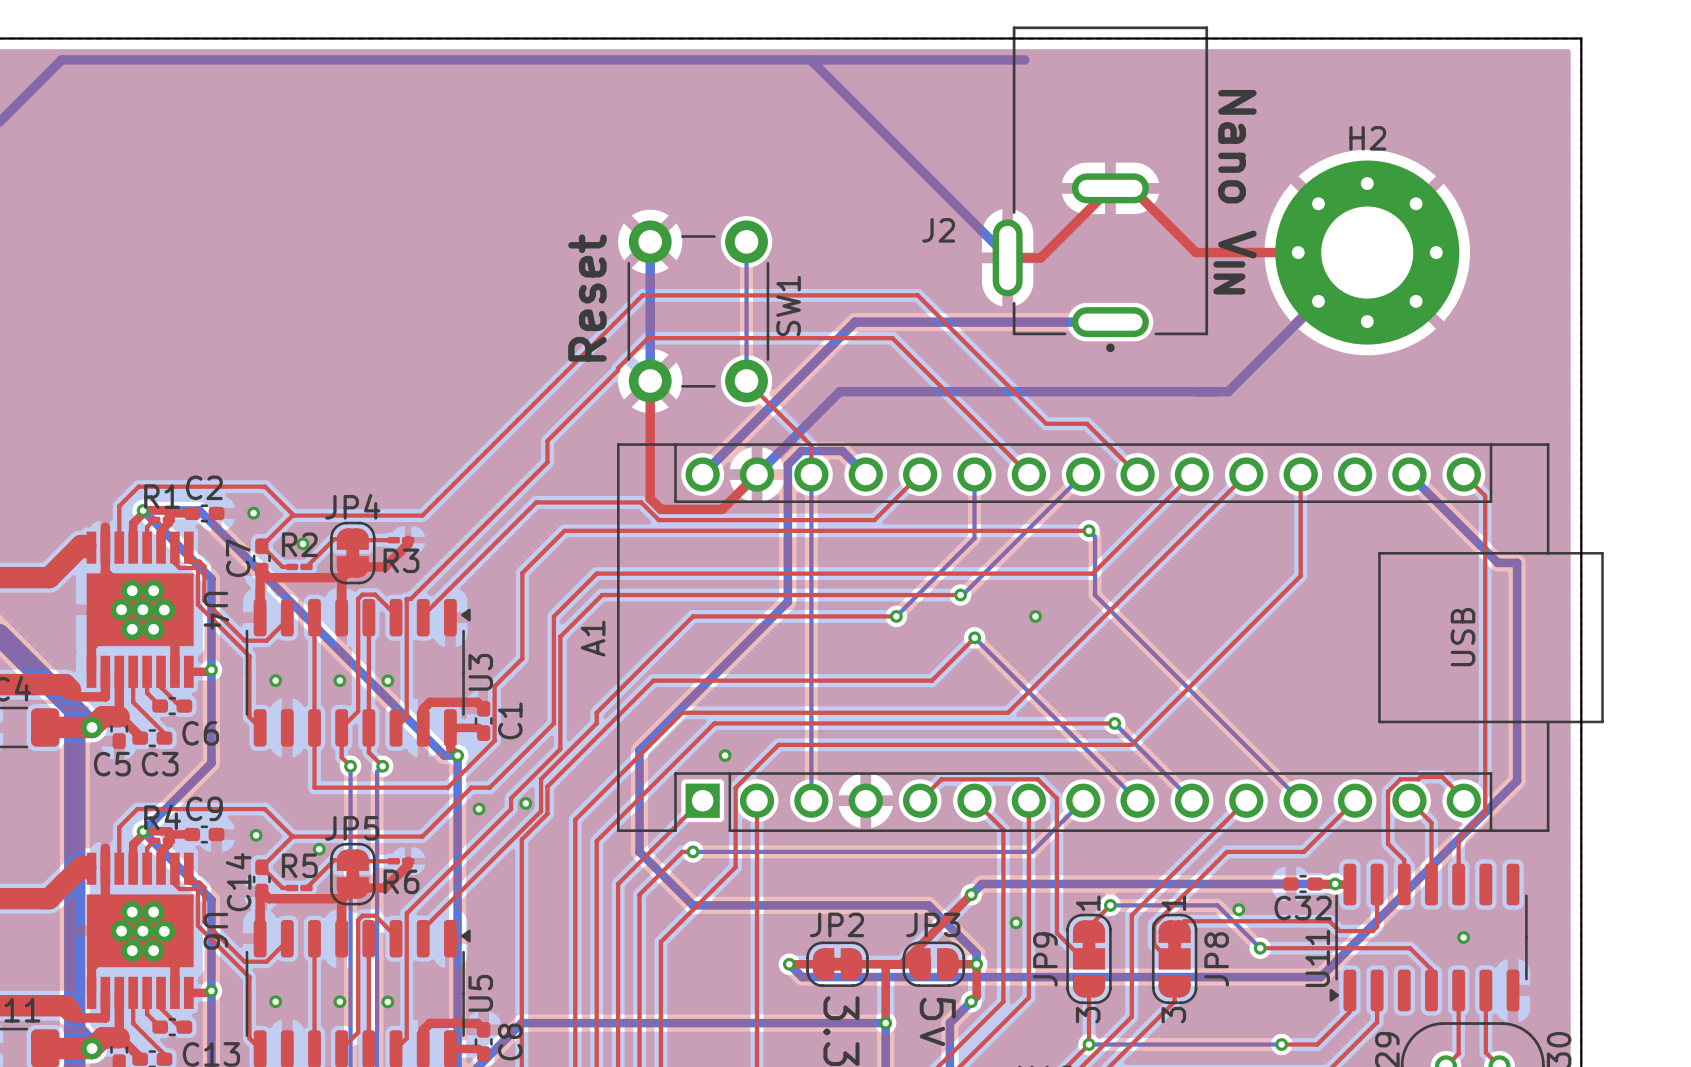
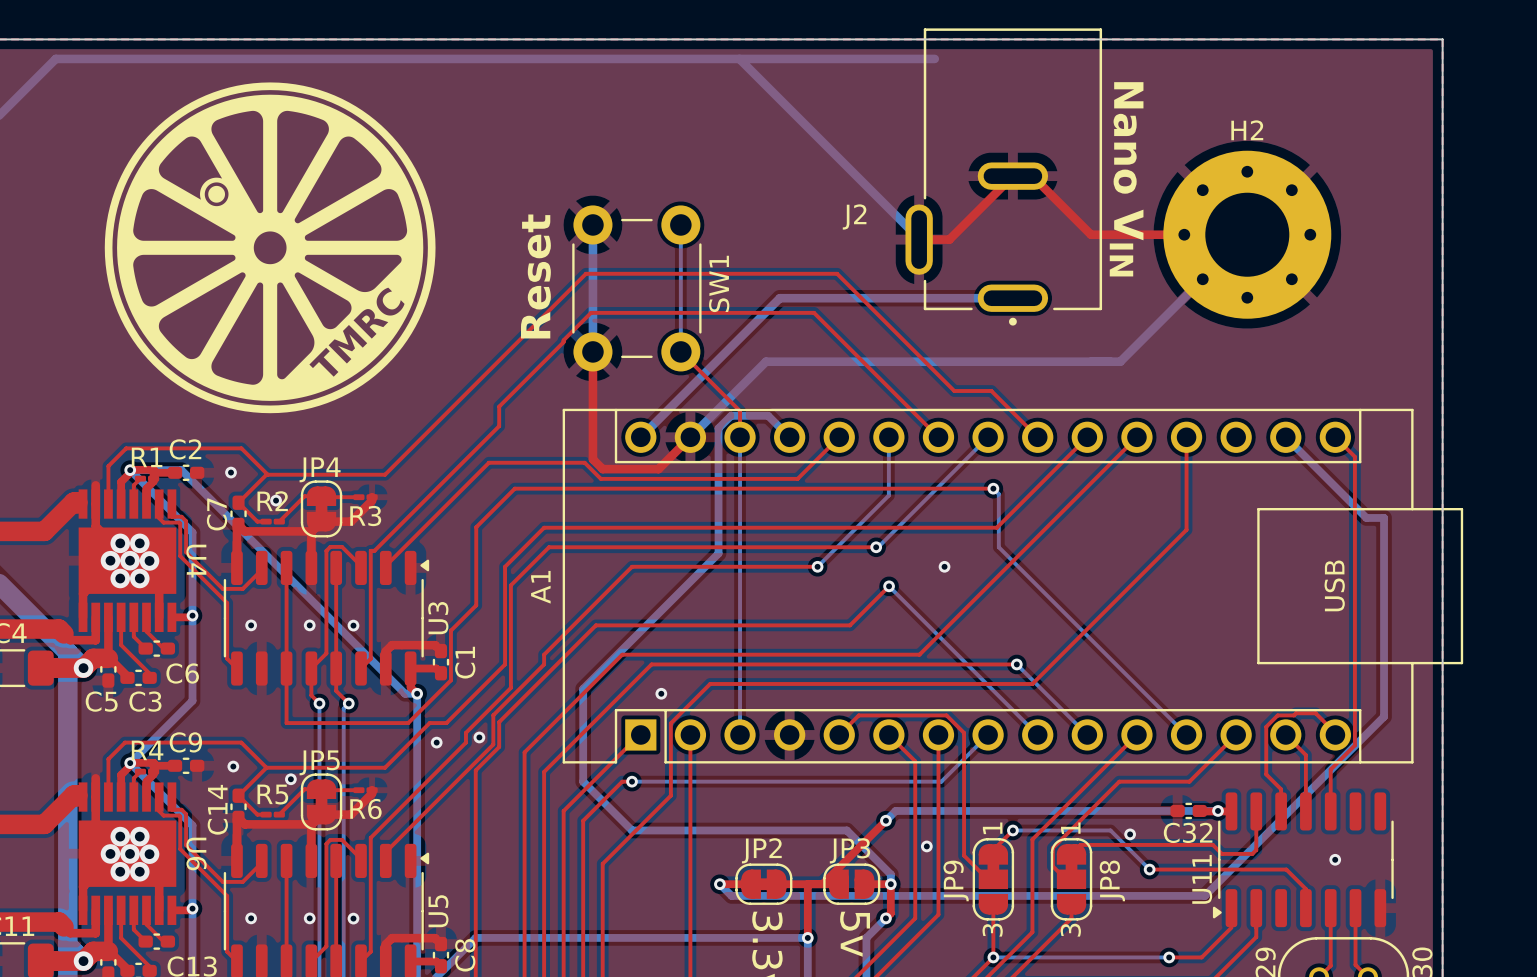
drawing: none -> [104, 82, 436, 414]

